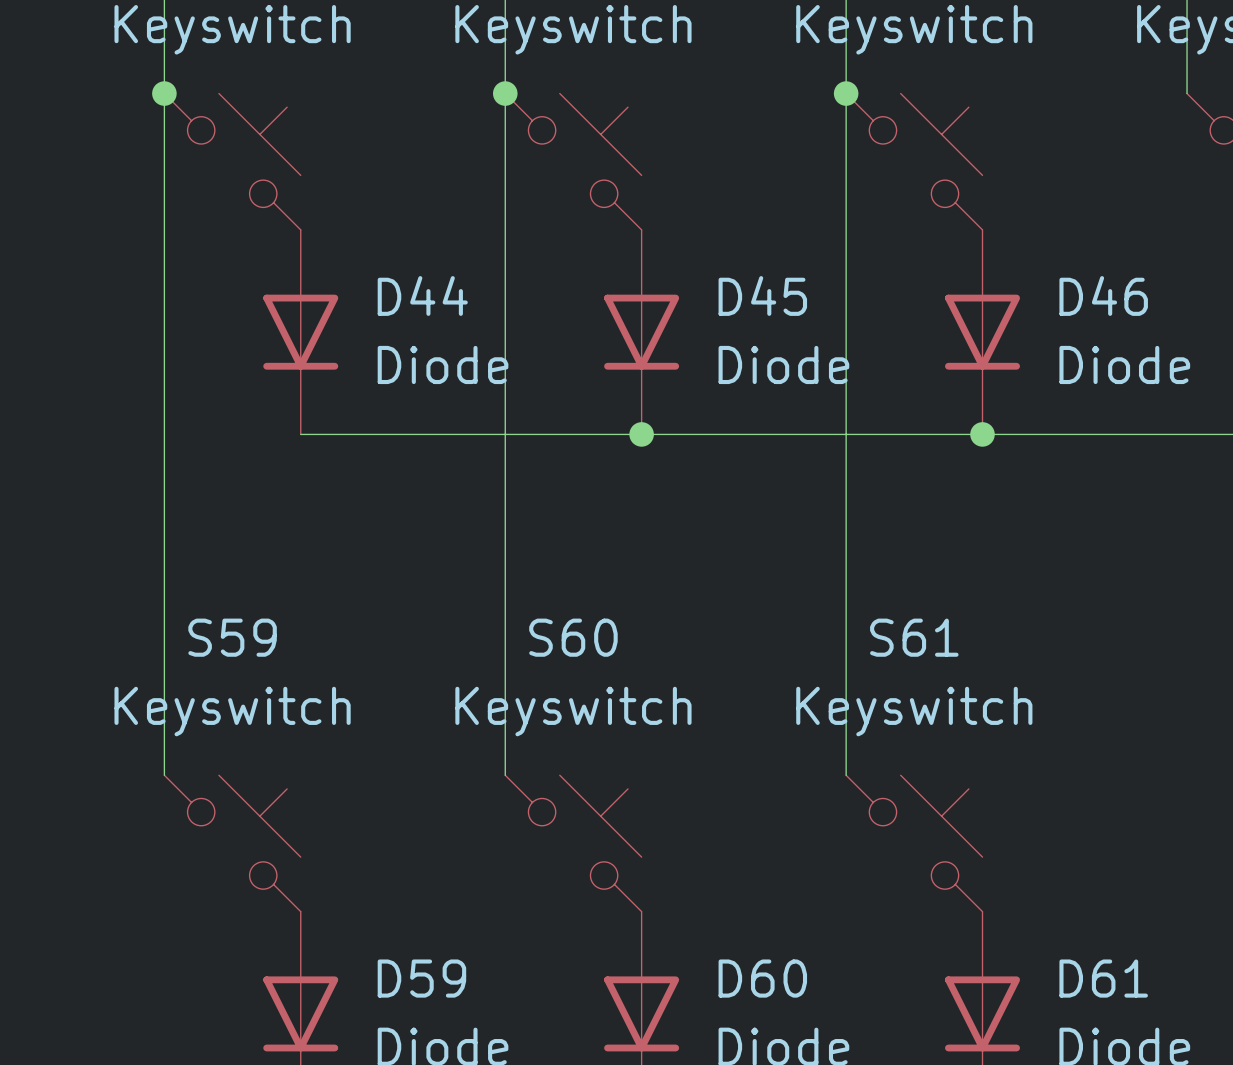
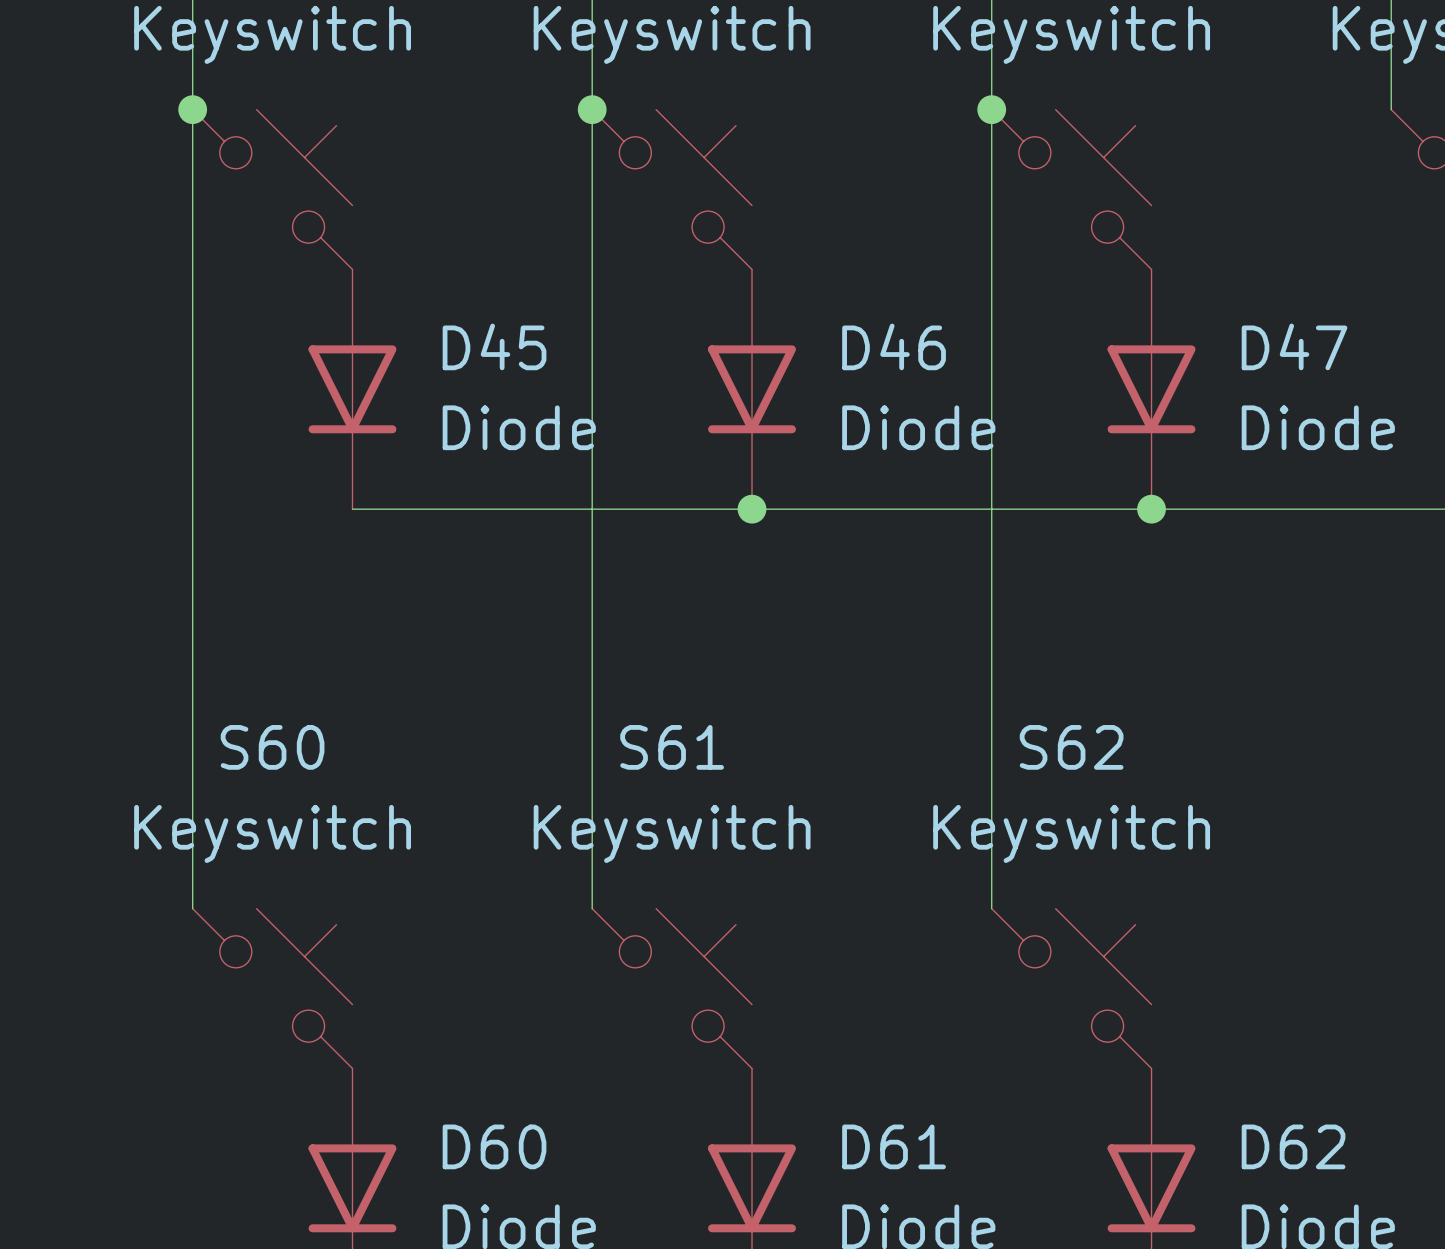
D44 name: D44 (422, 295) -> D45 (494, 346)
D45 name: D45 (762, 295) -> D46 (894, 346)
D46 name: D46 (1103, 295) -> D47 (1294, 346)
S59 name: S59 (232, 637) -> S60 (272, 747)
S60 name: S60 (573, 637) -> S61 (672, 747)
S61 name: S61 (914, 637) -> S62 (1071, 747)
D59 name: D59 (421, 978) -> D60 (494, 1146)
D60 name: D60 (762, 978) -> D61 (894, 1146)
D61 name: D61 (1103, 978) -> D62 (1293, 1146)

